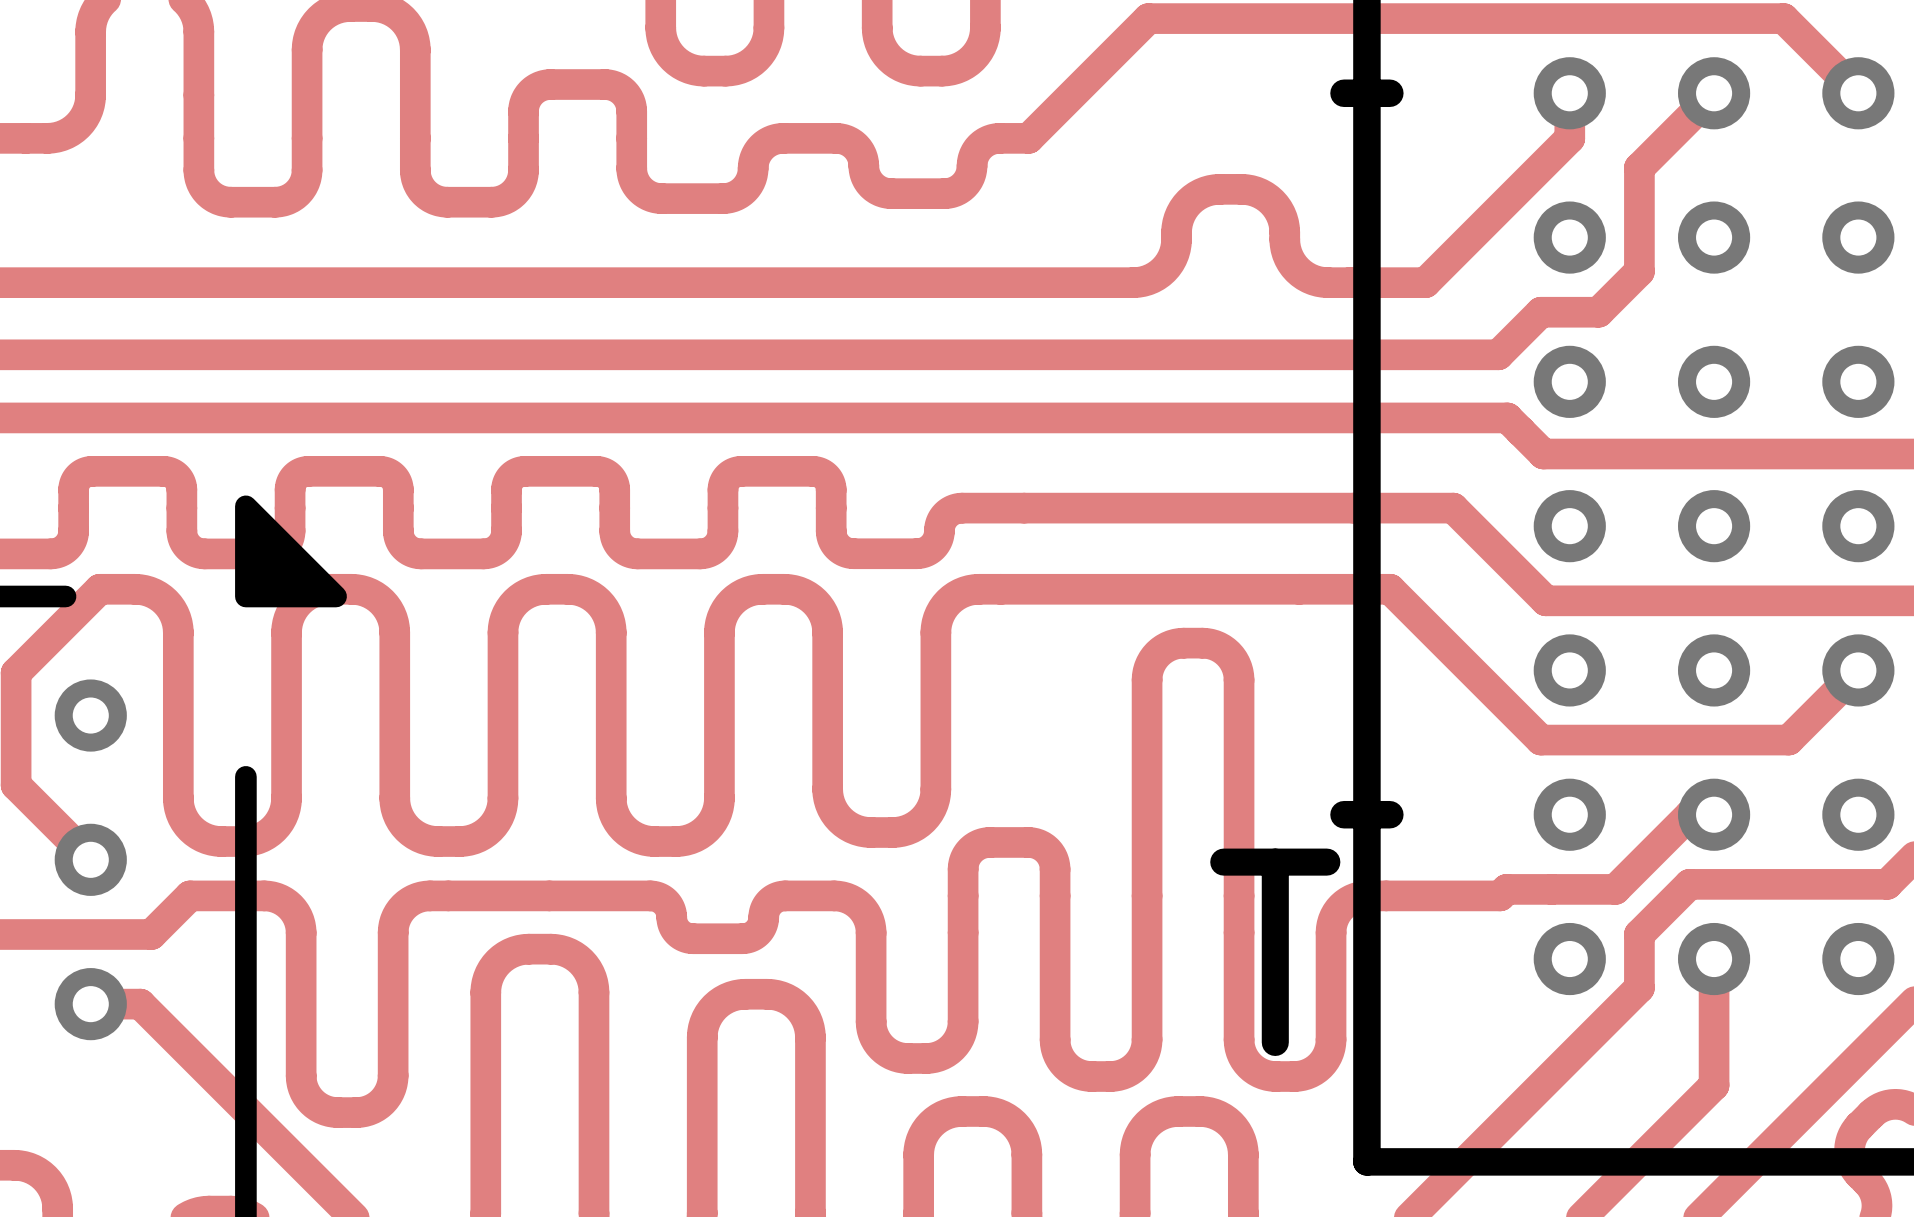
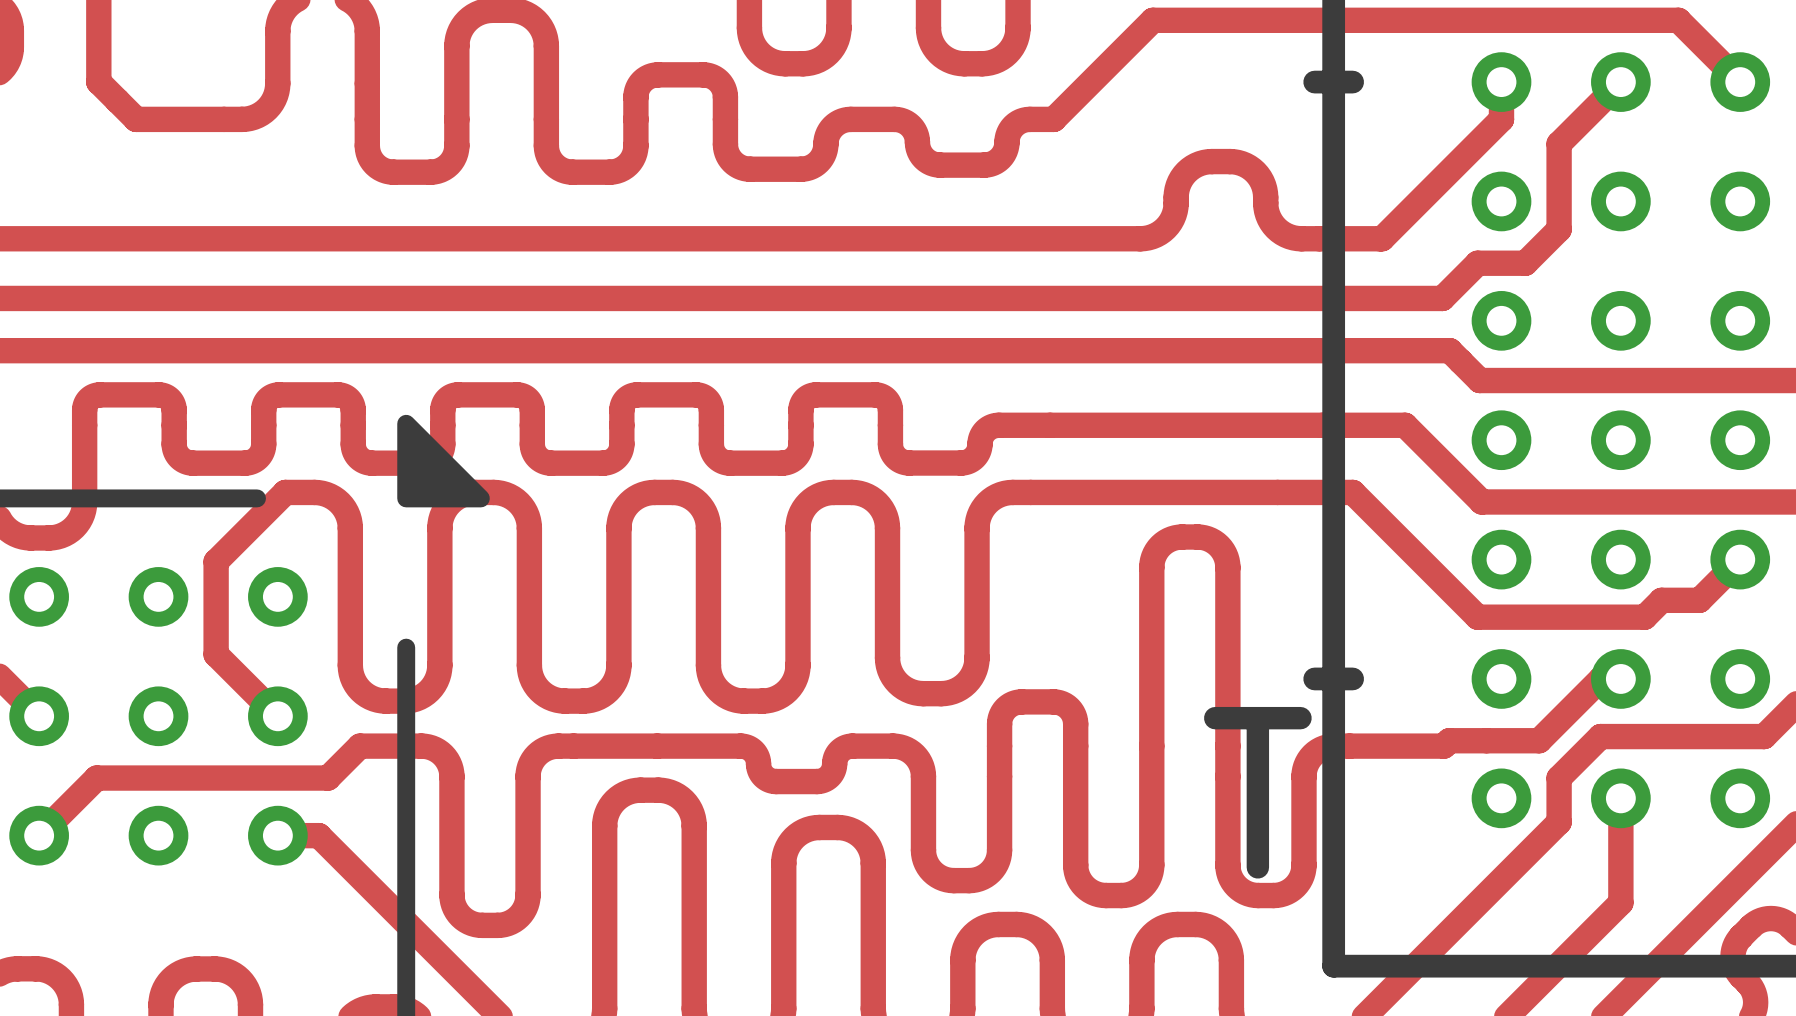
track: (1809, 719) (1788, 740) (1742, 740) -> (1699, 600) (1661, 600) (1644, 617)

